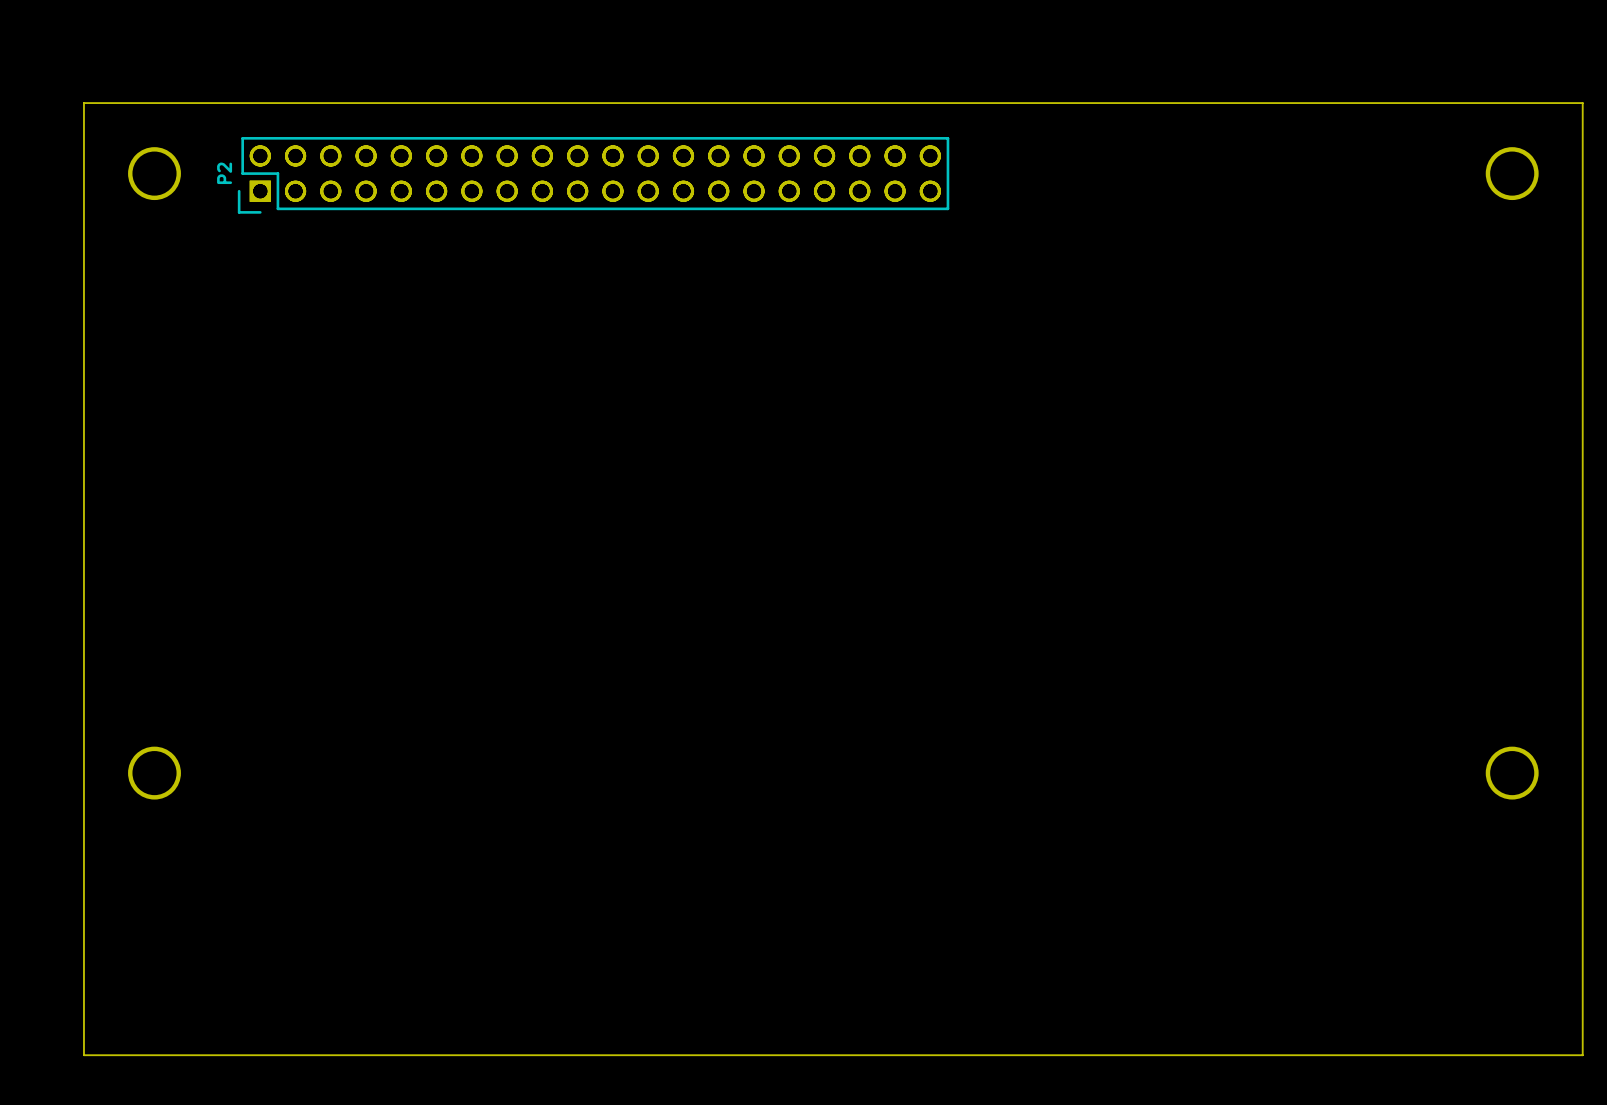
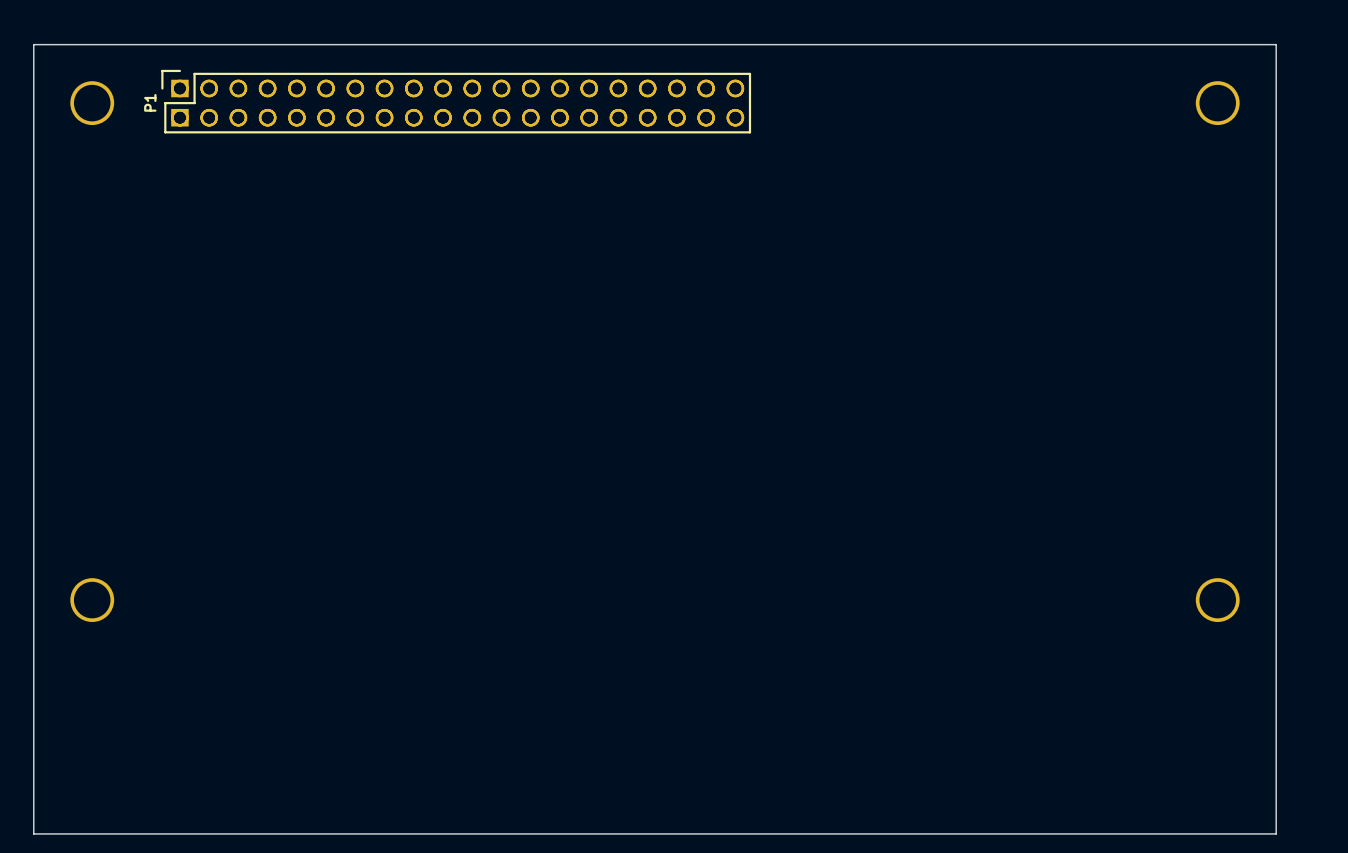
P1: none -> (456, 101)
P2: (593, 175) -> none

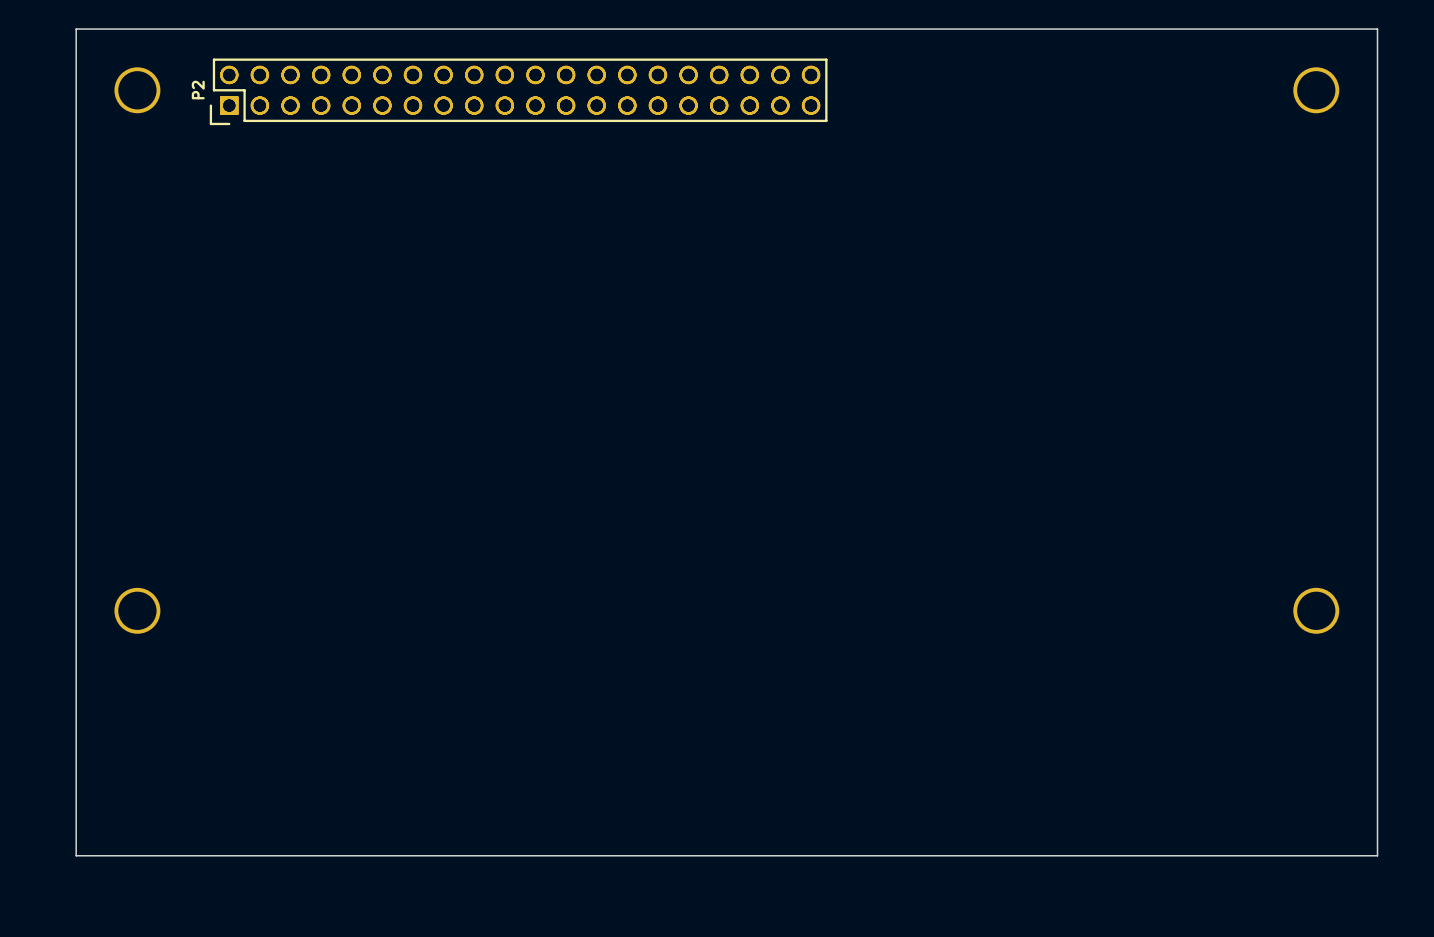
P1: (456, 101) -> none
P2: none -> (518, 91)

